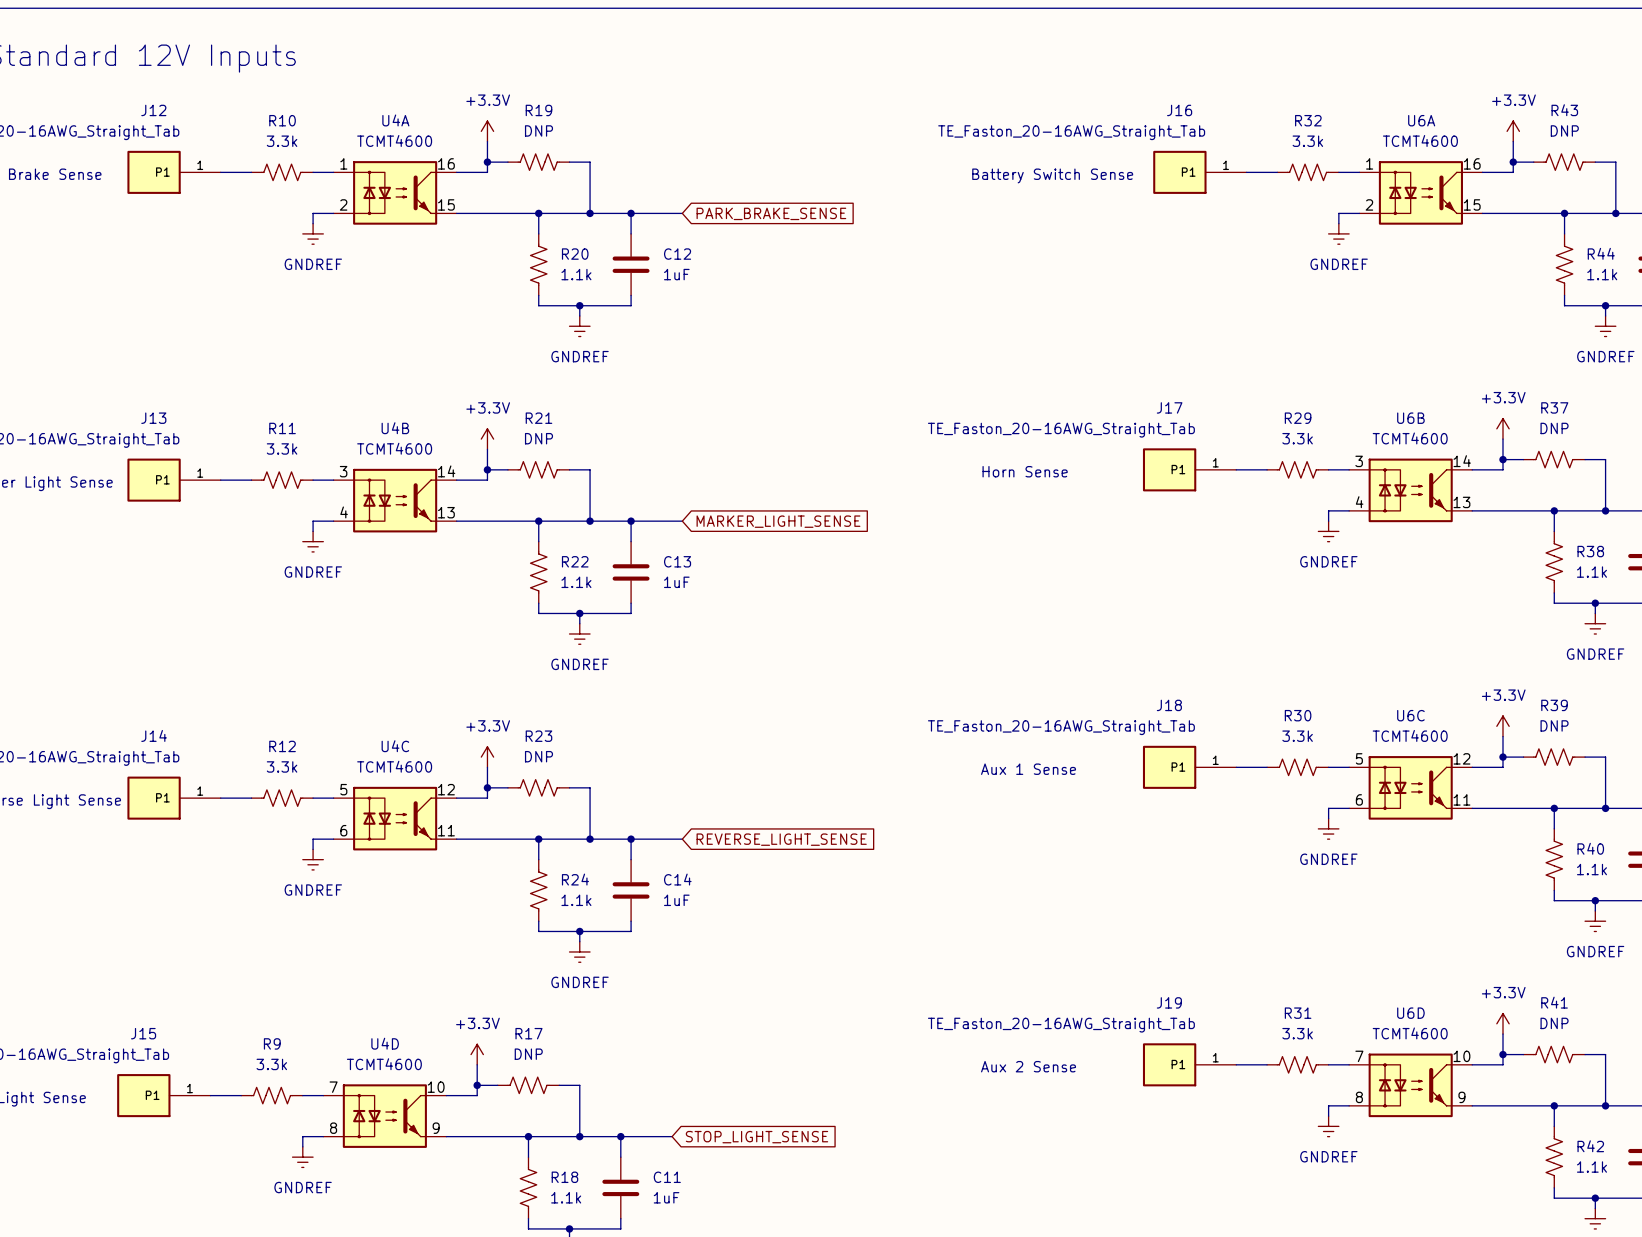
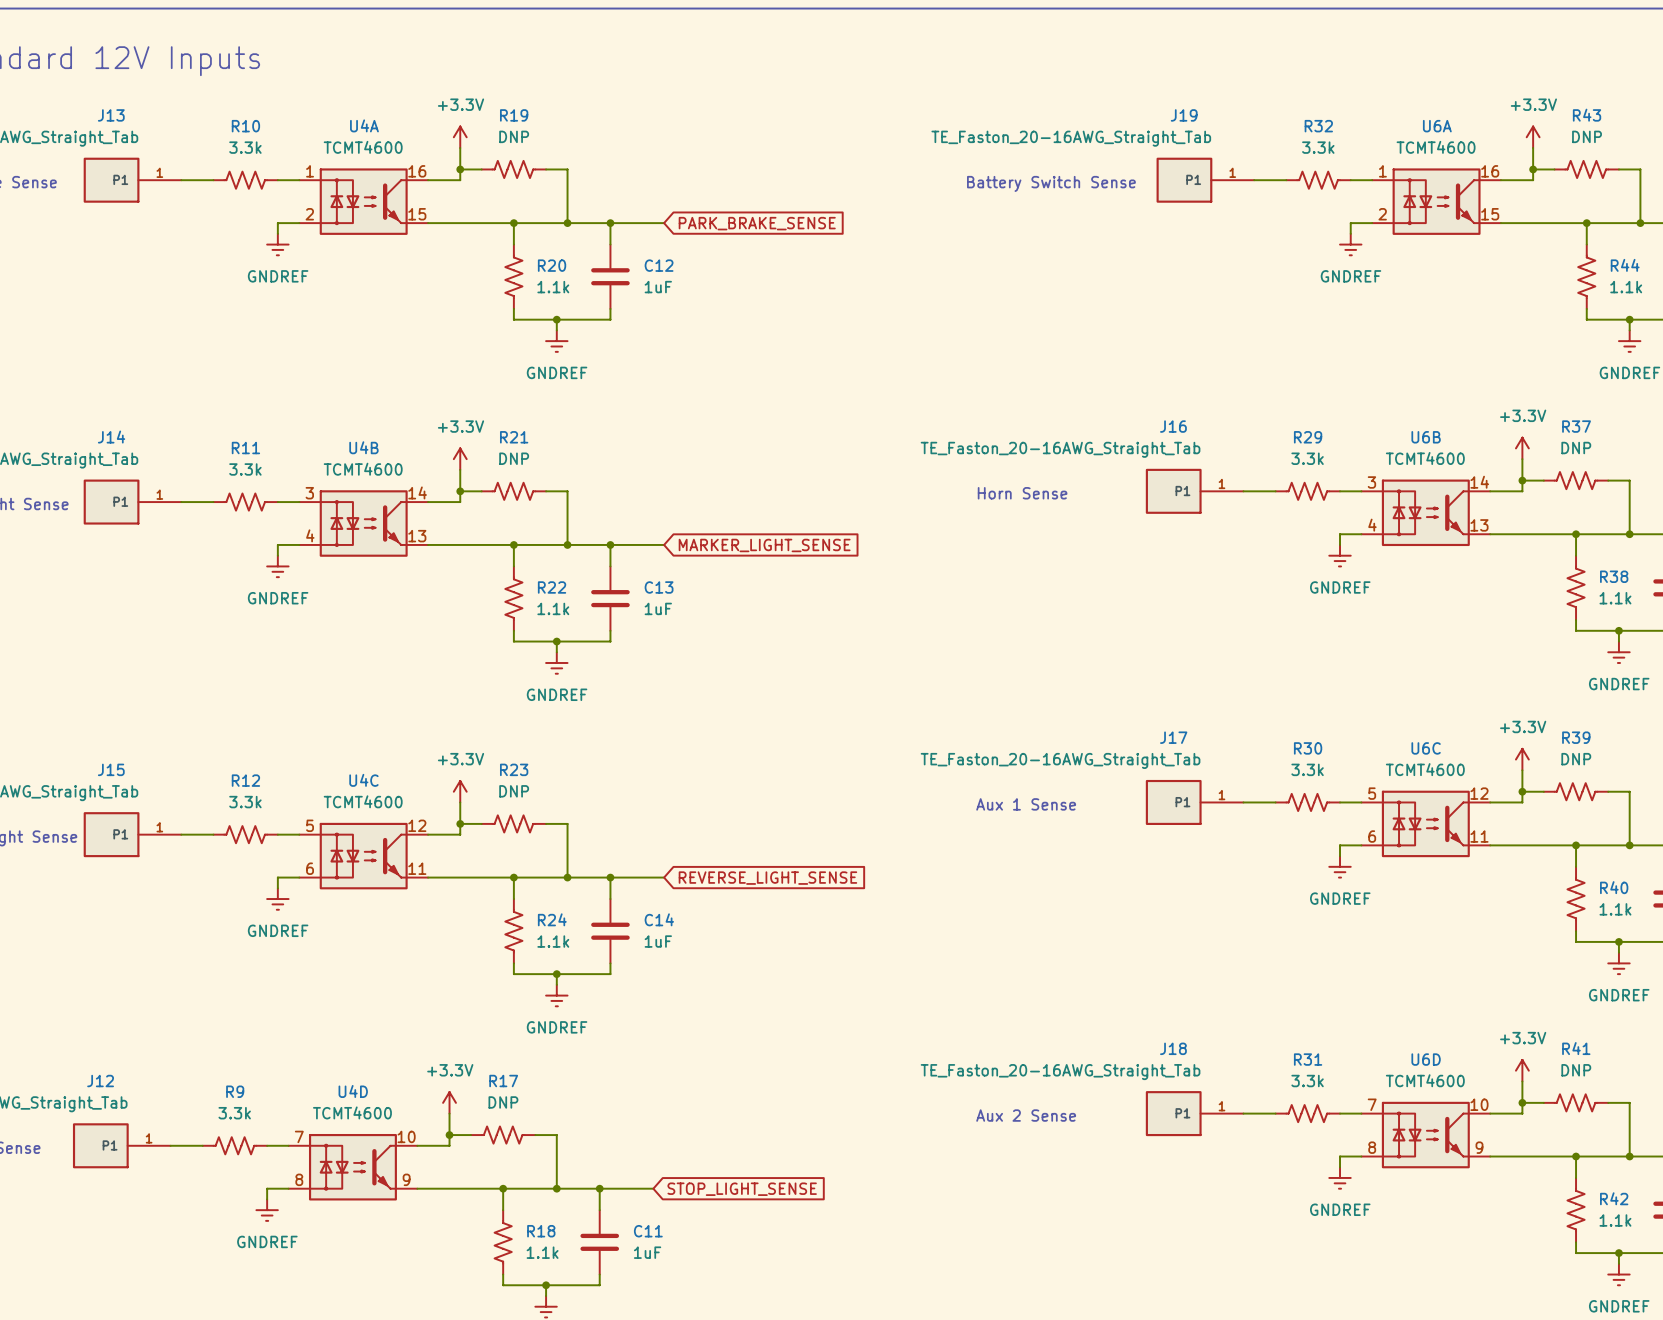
J12 name: J12 (153, 110) -> J13 (111, 115)
J16 name: J16 (1179, 110) -> J19 (1184, 115)
J17 name: J17 (1169, 407) -> J16 (1173, 426)
J13 name: J13 (153, 418) -> J14 (111, 437)
J18 name: J18 (1169, 705) -> J17 (1173, 737)
J14 name: J14 (154, 735) -> J15 (111, 769)
J19 name: J19 (1169, 1002) -> J18 (1173, 1048)
J15 name: J15 (143, 1033) -> J12 (100, 1081)

